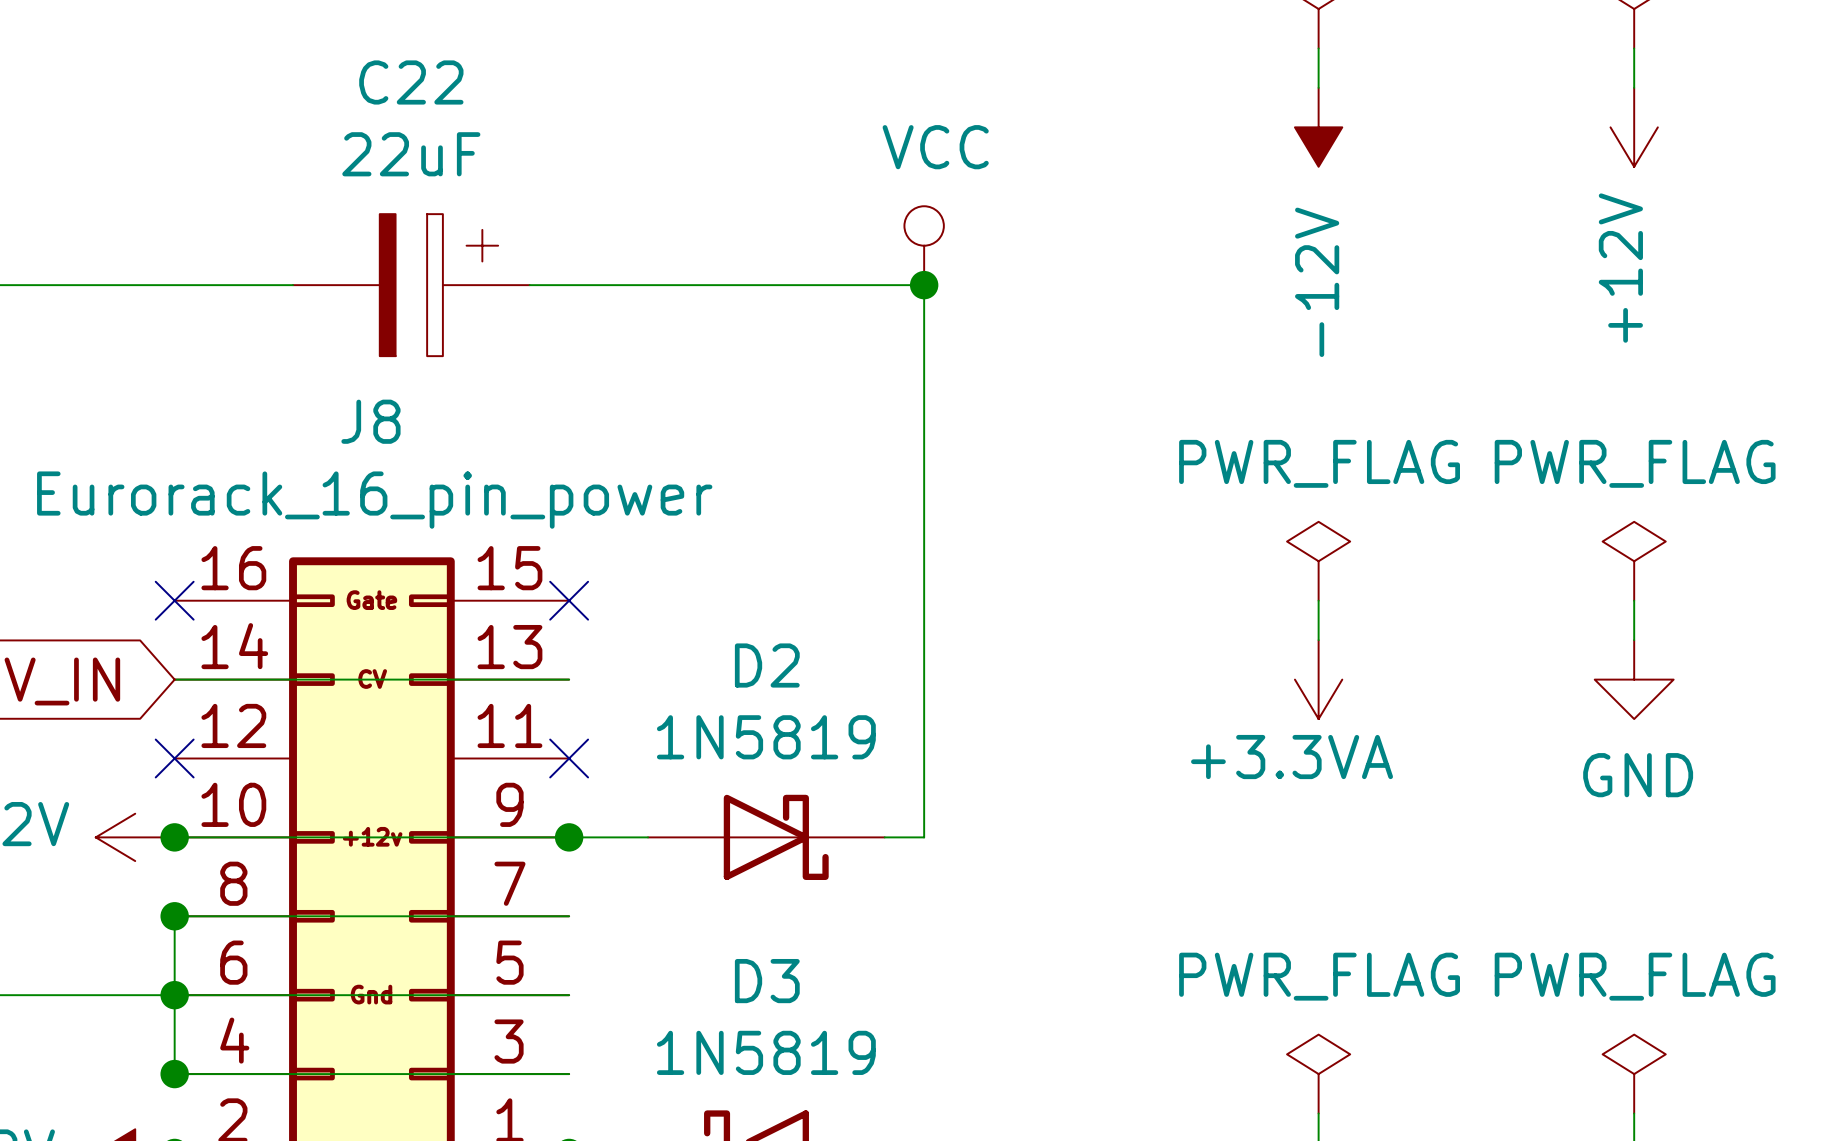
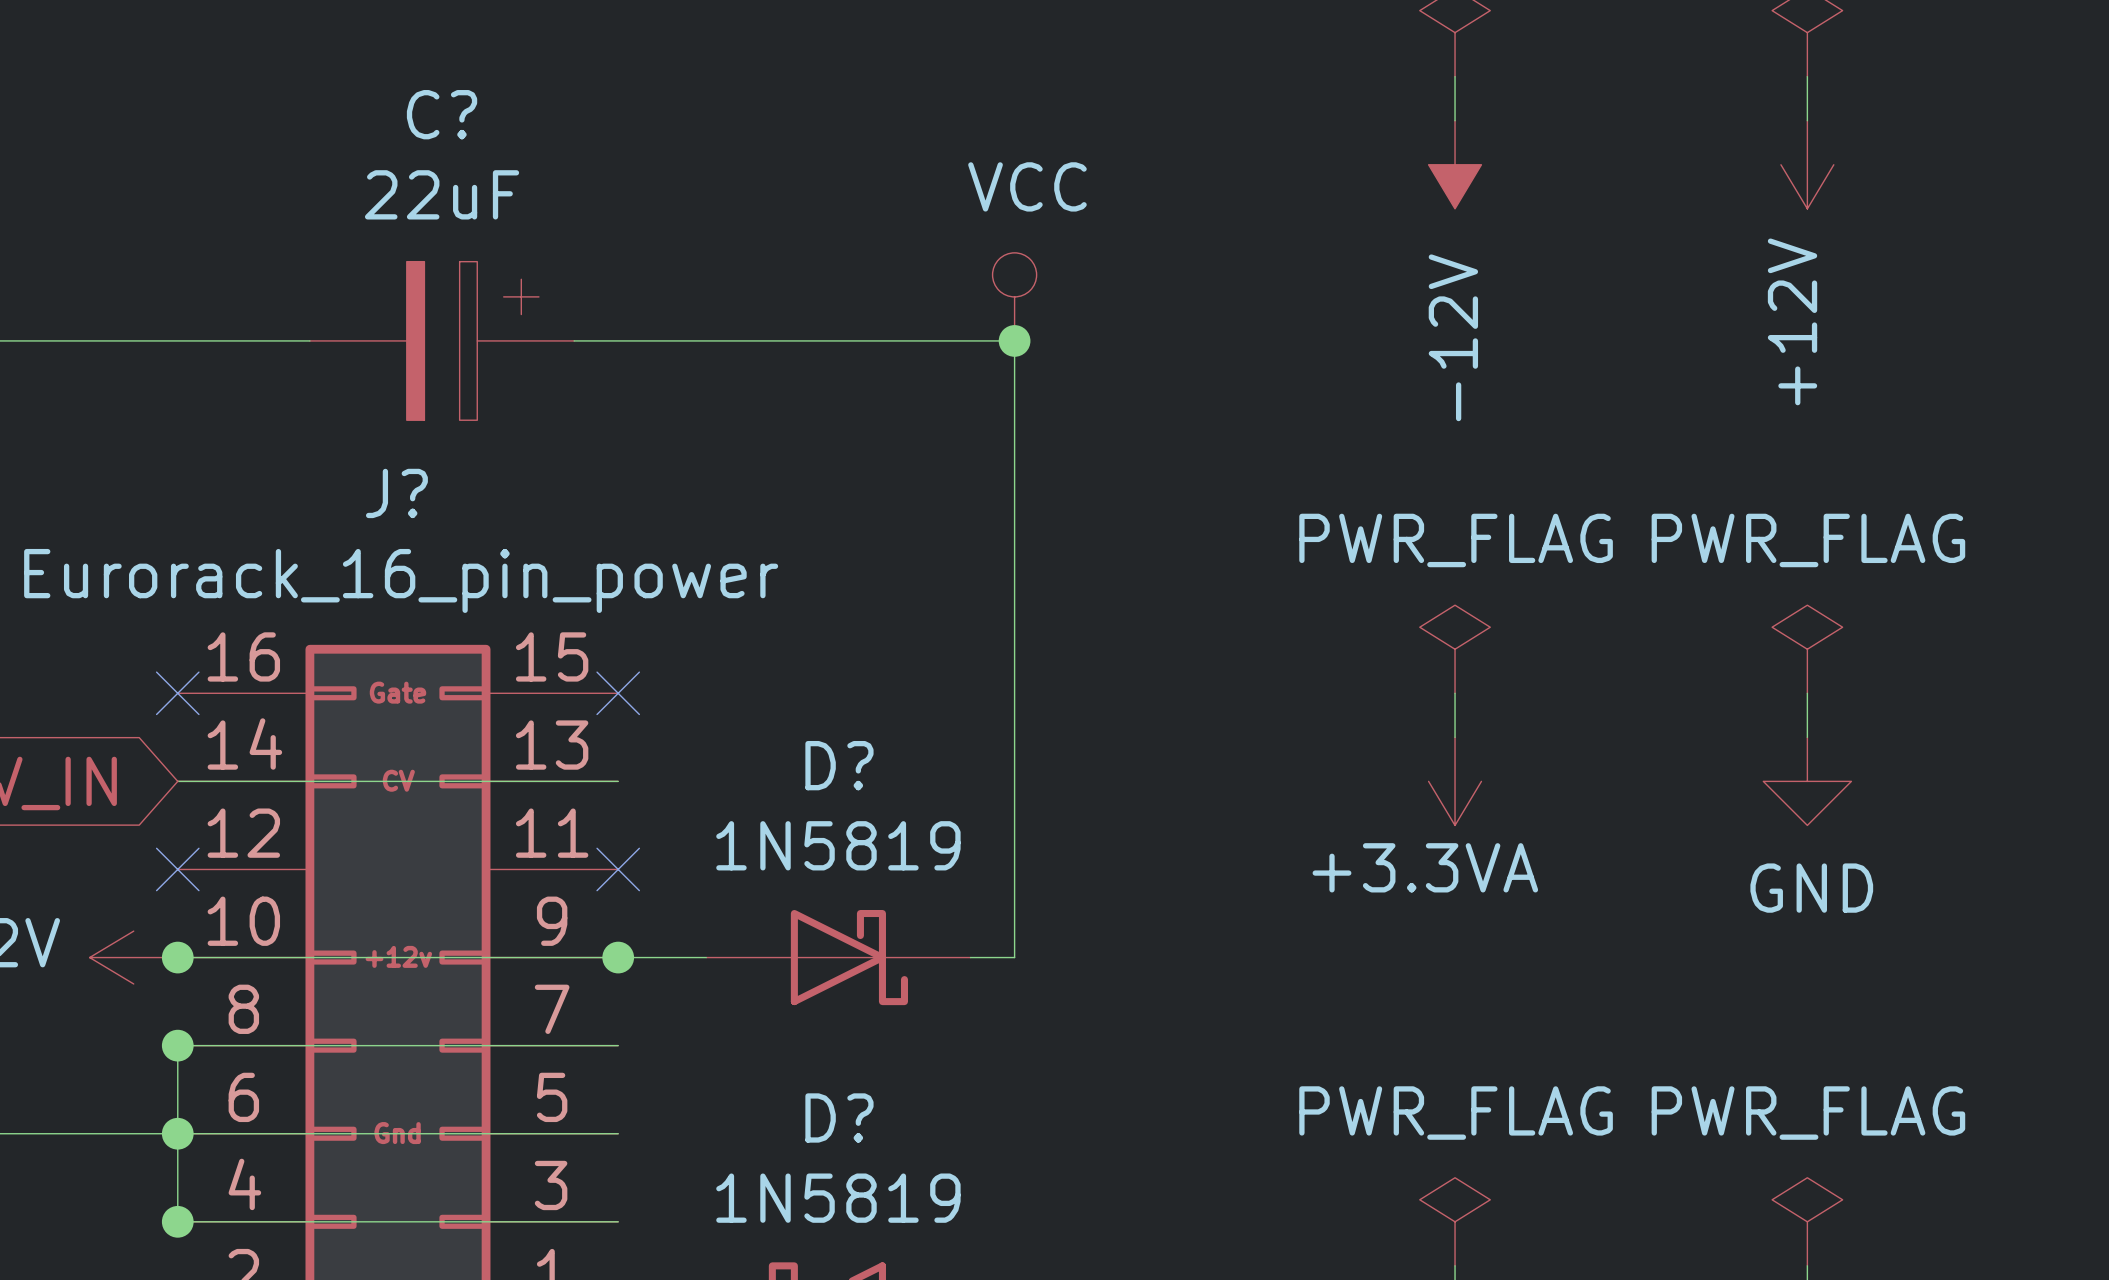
C22 name: C22 (411, 82) -> C? (442, 114)
J8 name: J8 (370, 421) -> J? (396, 493)
D2 name: D2 (767, 665) -> D? (839, 765)
D3 name: D3 (767, 981) -> D? (839, 1117)

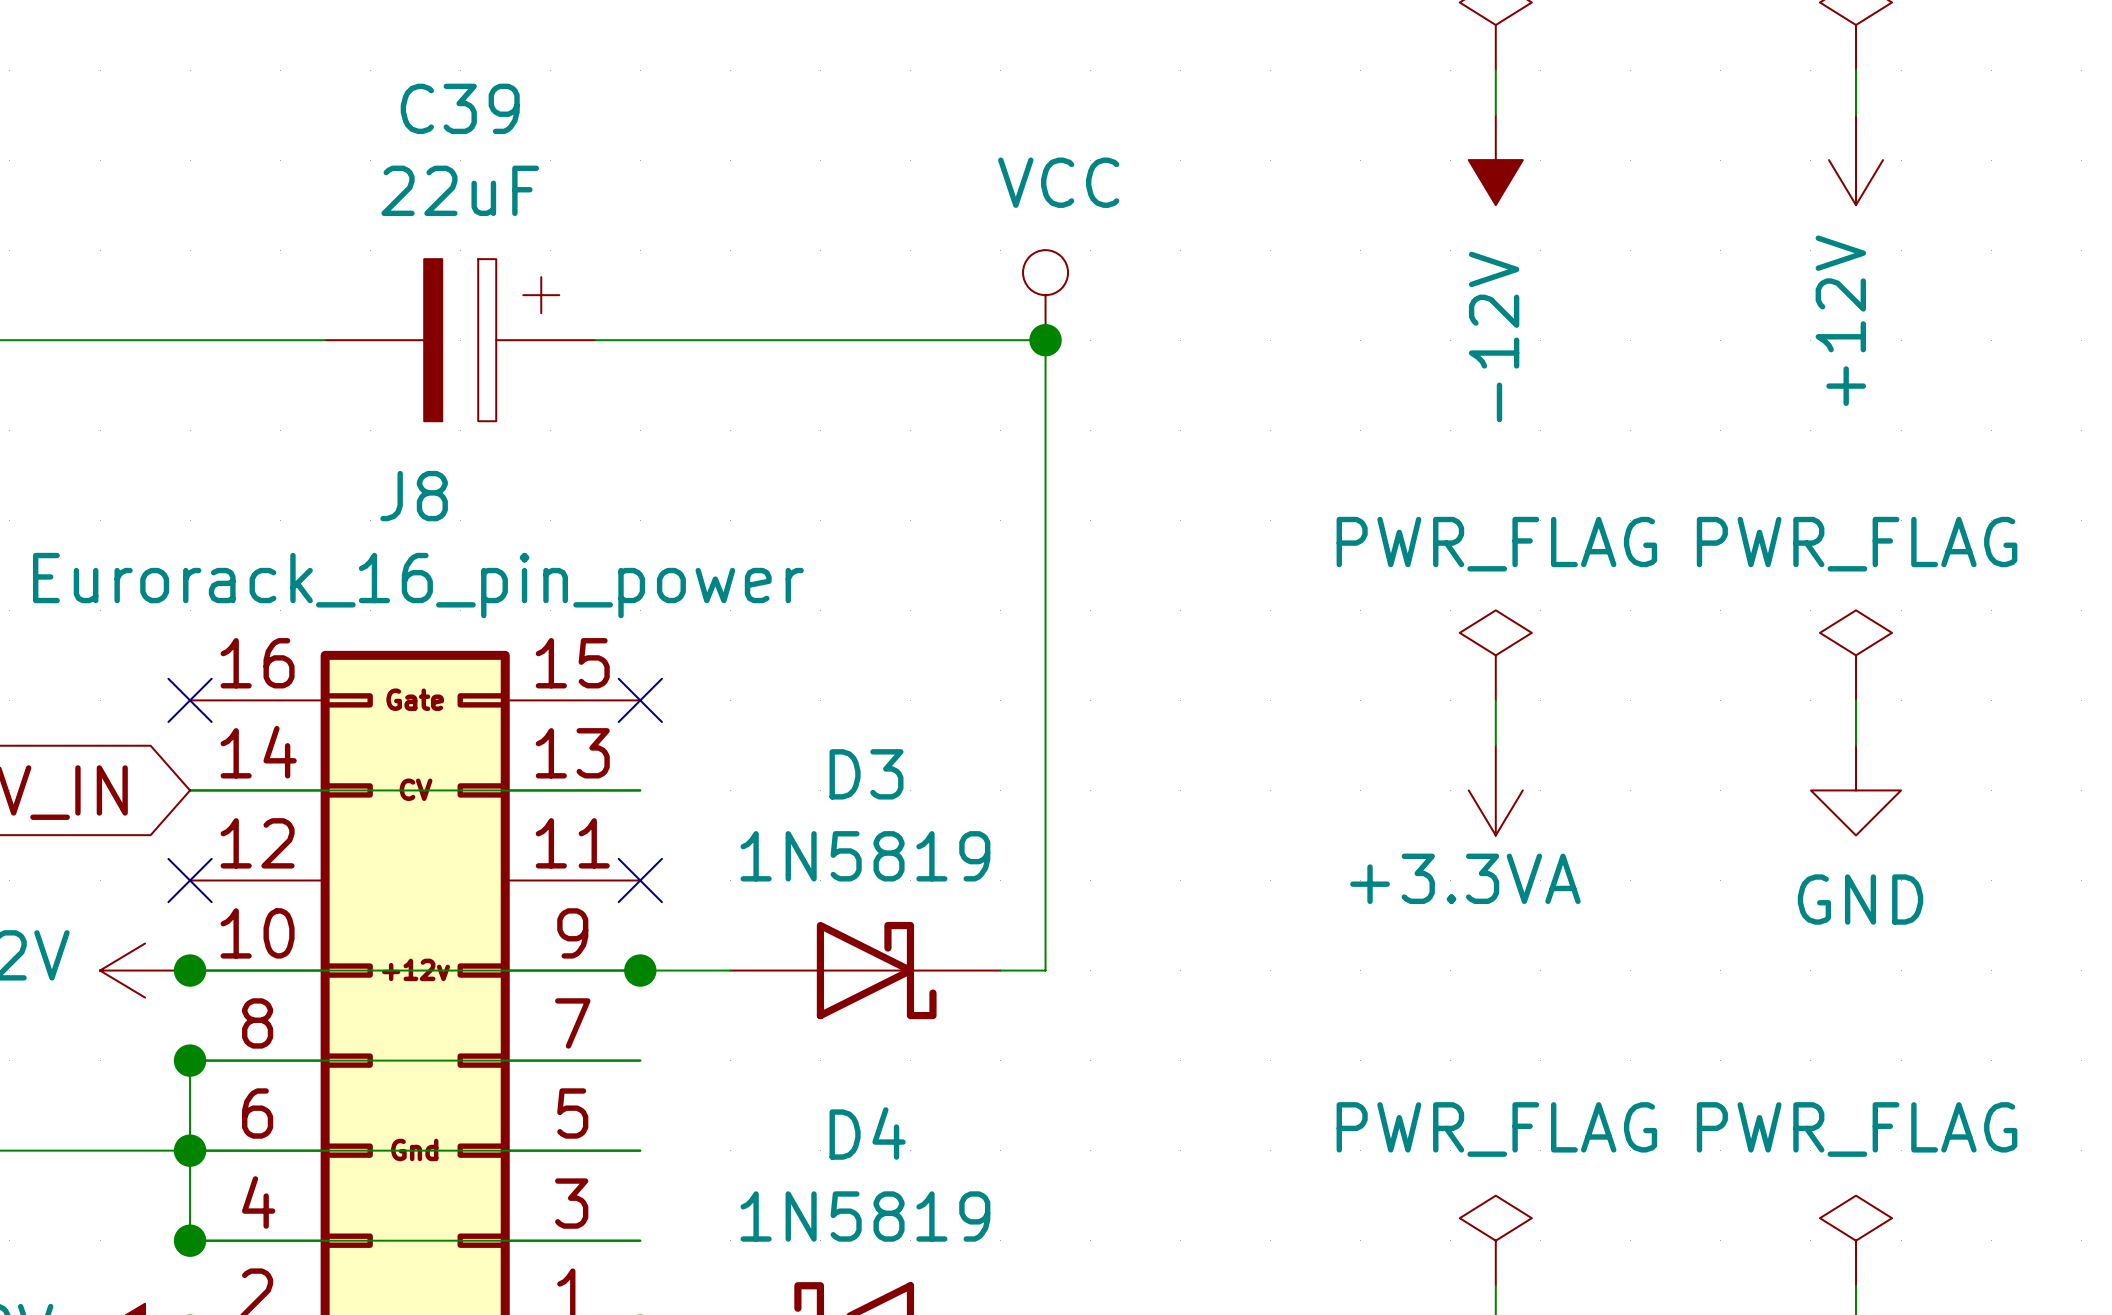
C? name: C? (442, 114) -> C39 (460, 108)
J? name: J? (396, 493) -> J8 (414, 496)
D? name: D? (839, 765) -> D3 (866, 774)
D? name: D? (839, 1117) -> D4 (867, 1133)

